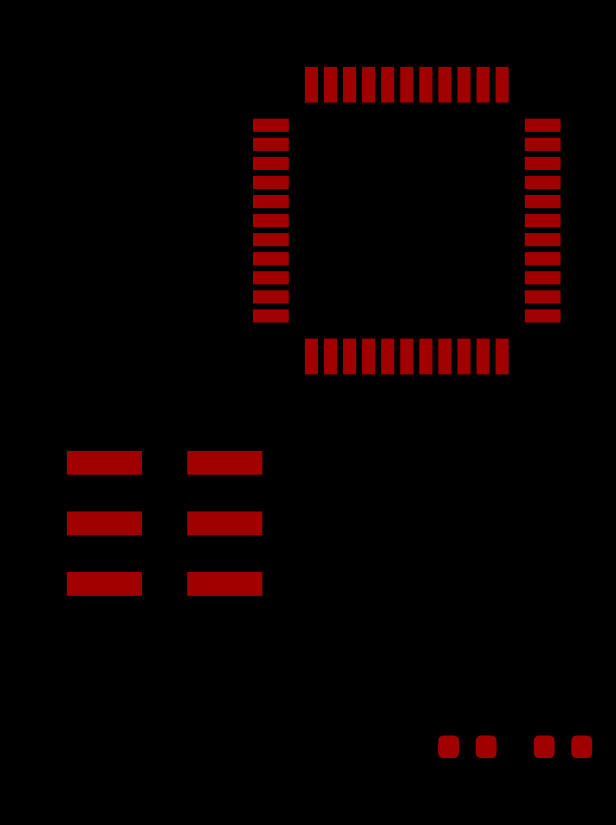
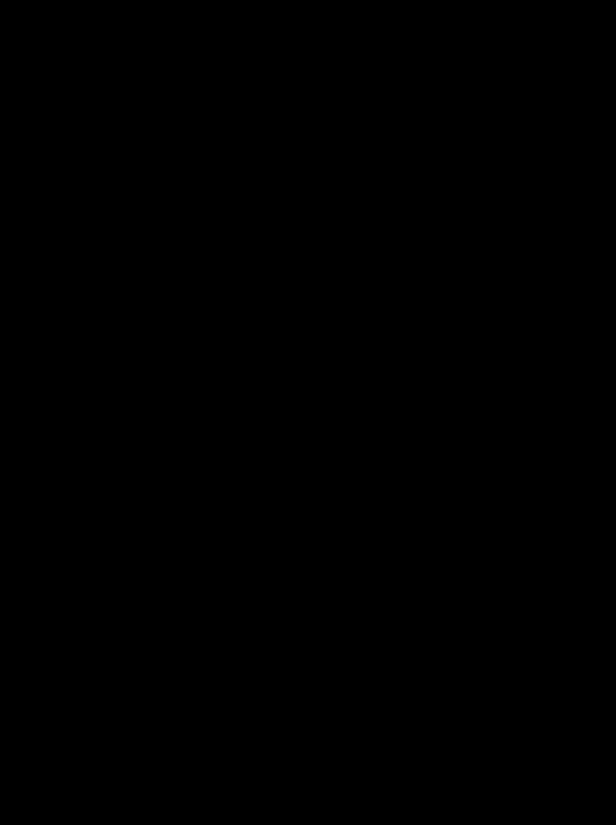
part: (406, 220) -> none
part: (164, 523) -> none
part: (467, 746) -> none
part: (562, 746) -> none

